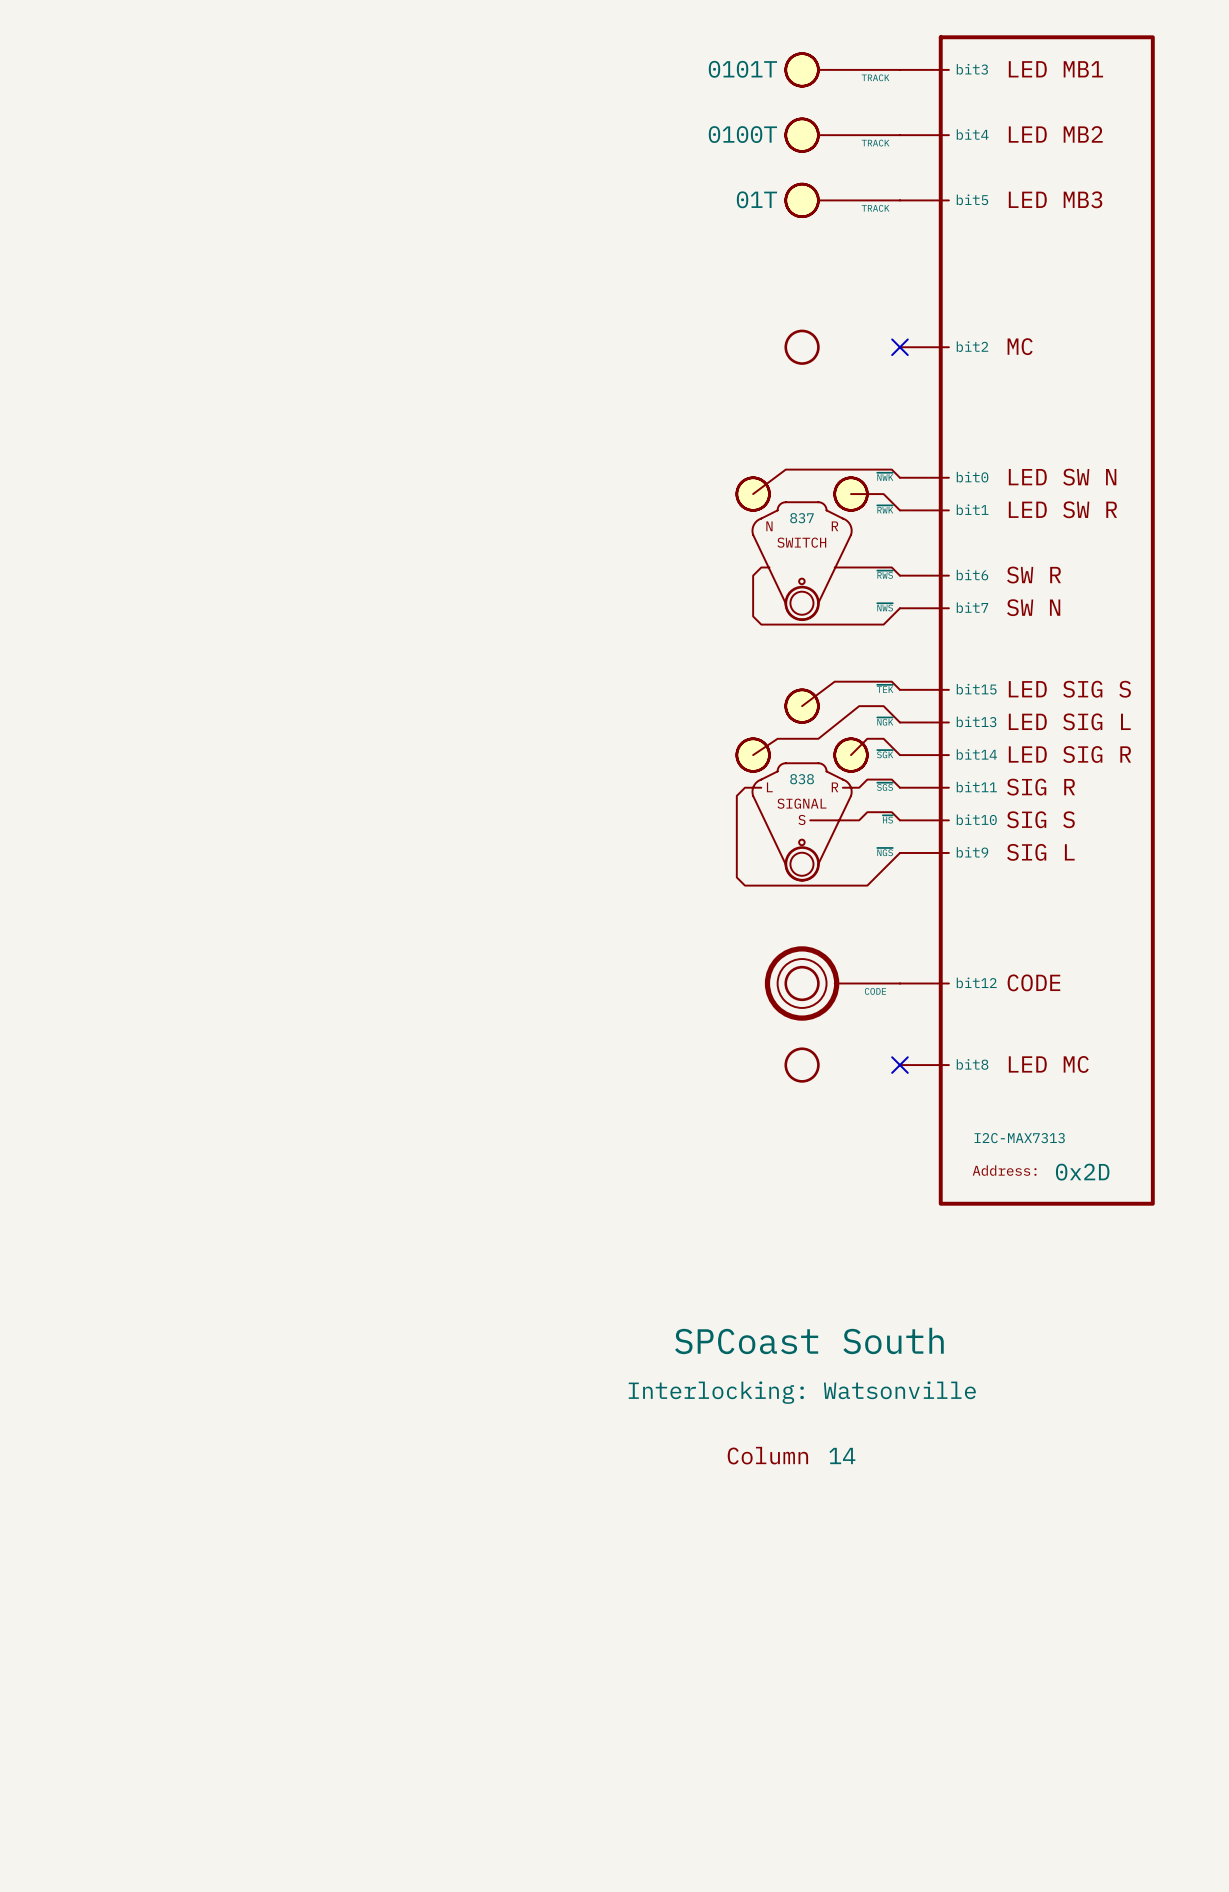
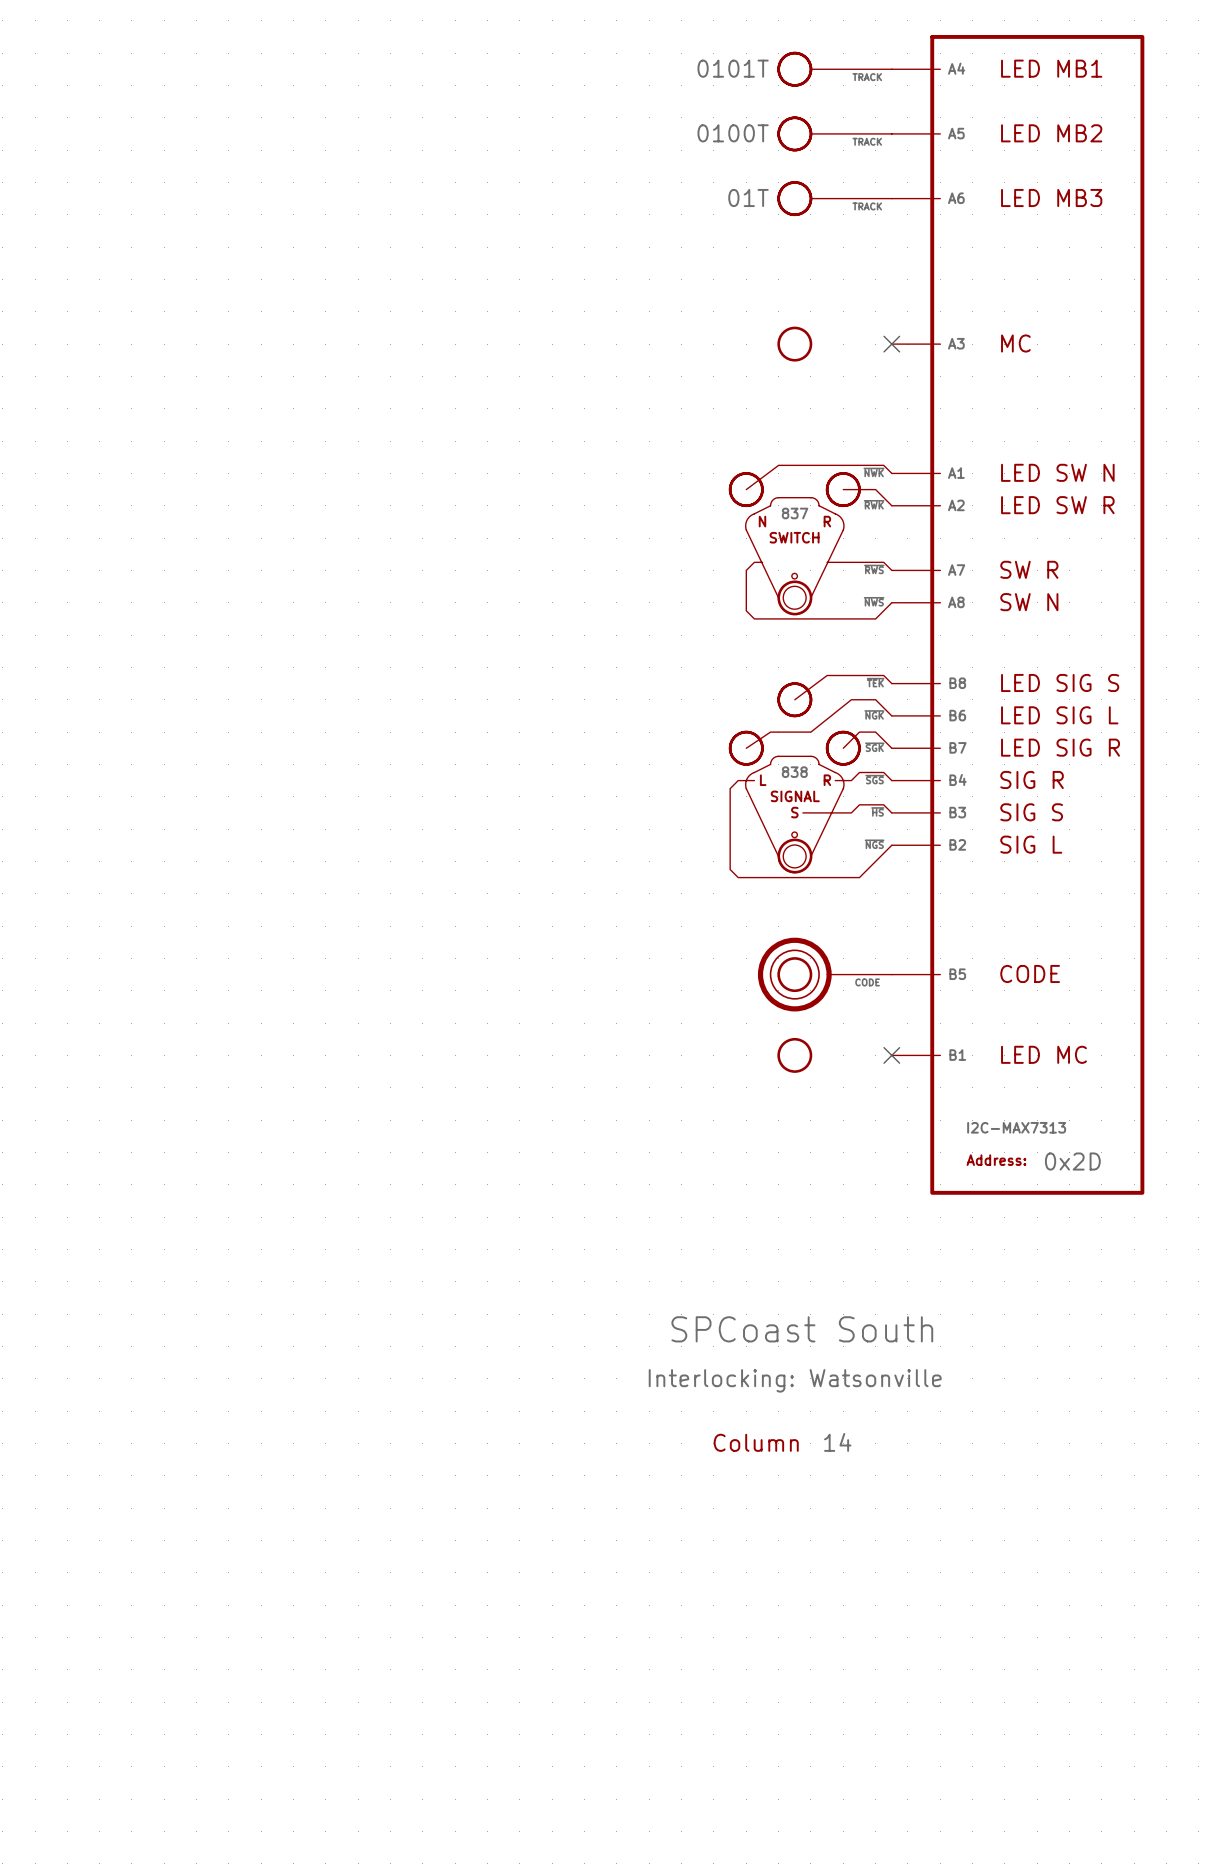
part symbol: [899, 35, 1155, 1206] -> [891, 35, 1145, 1195]

